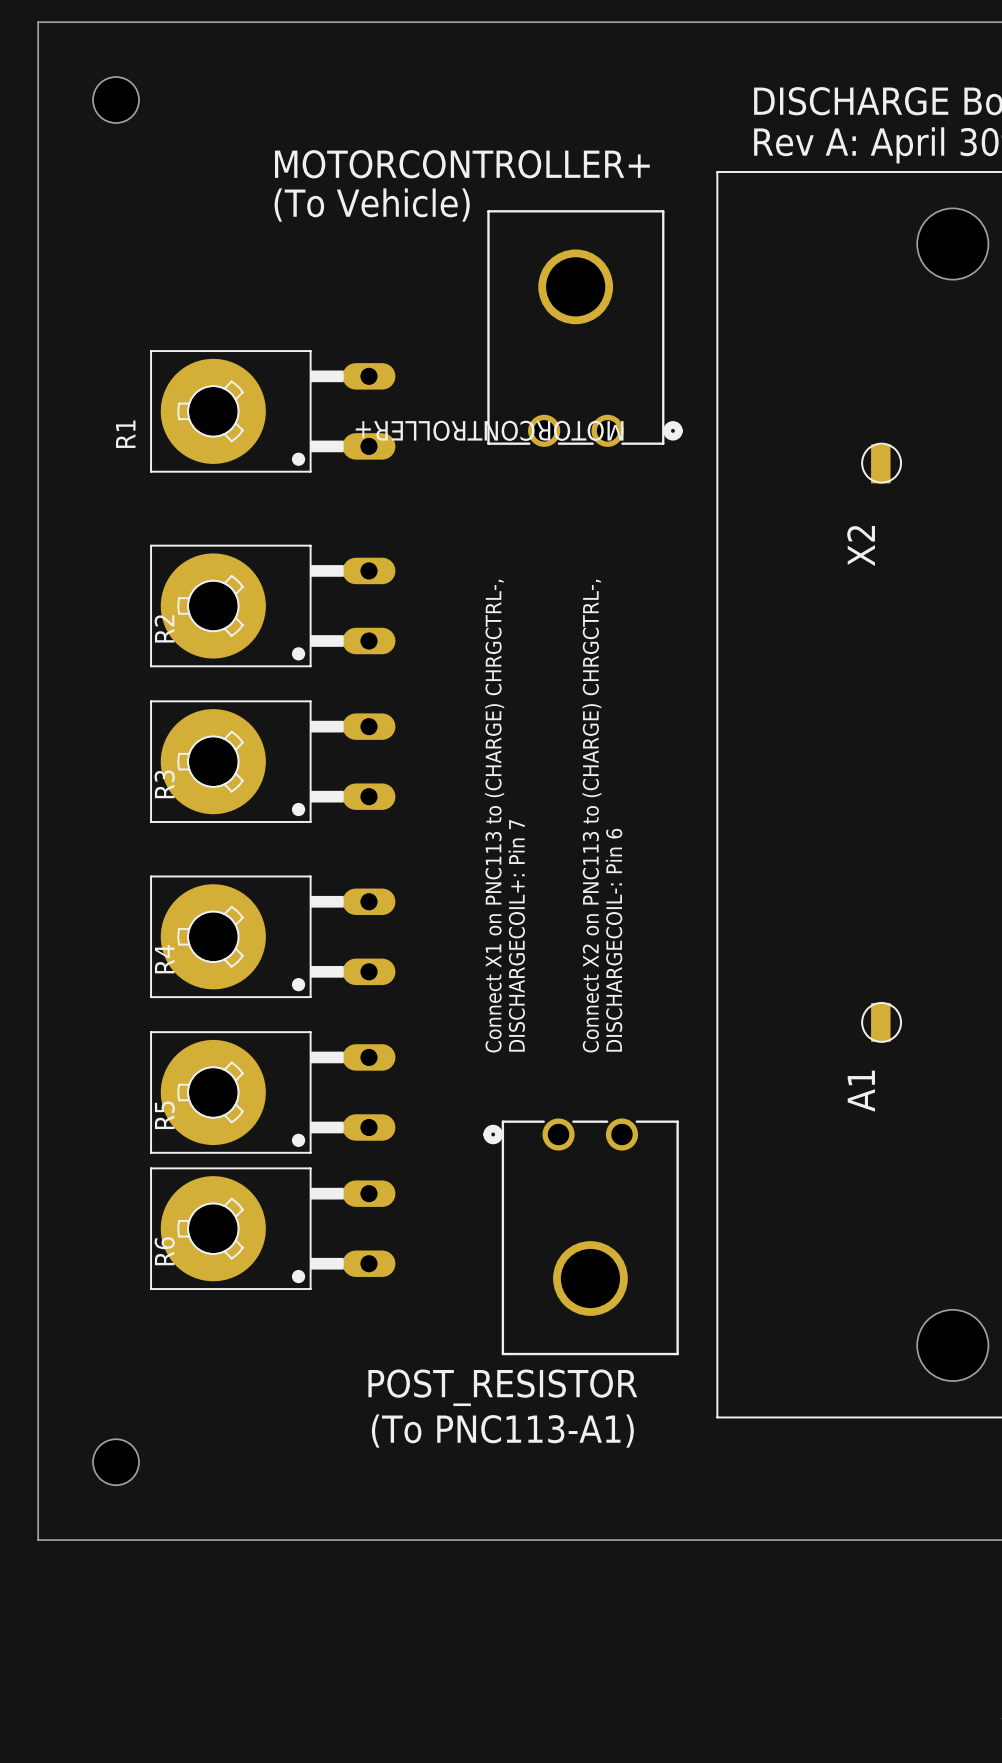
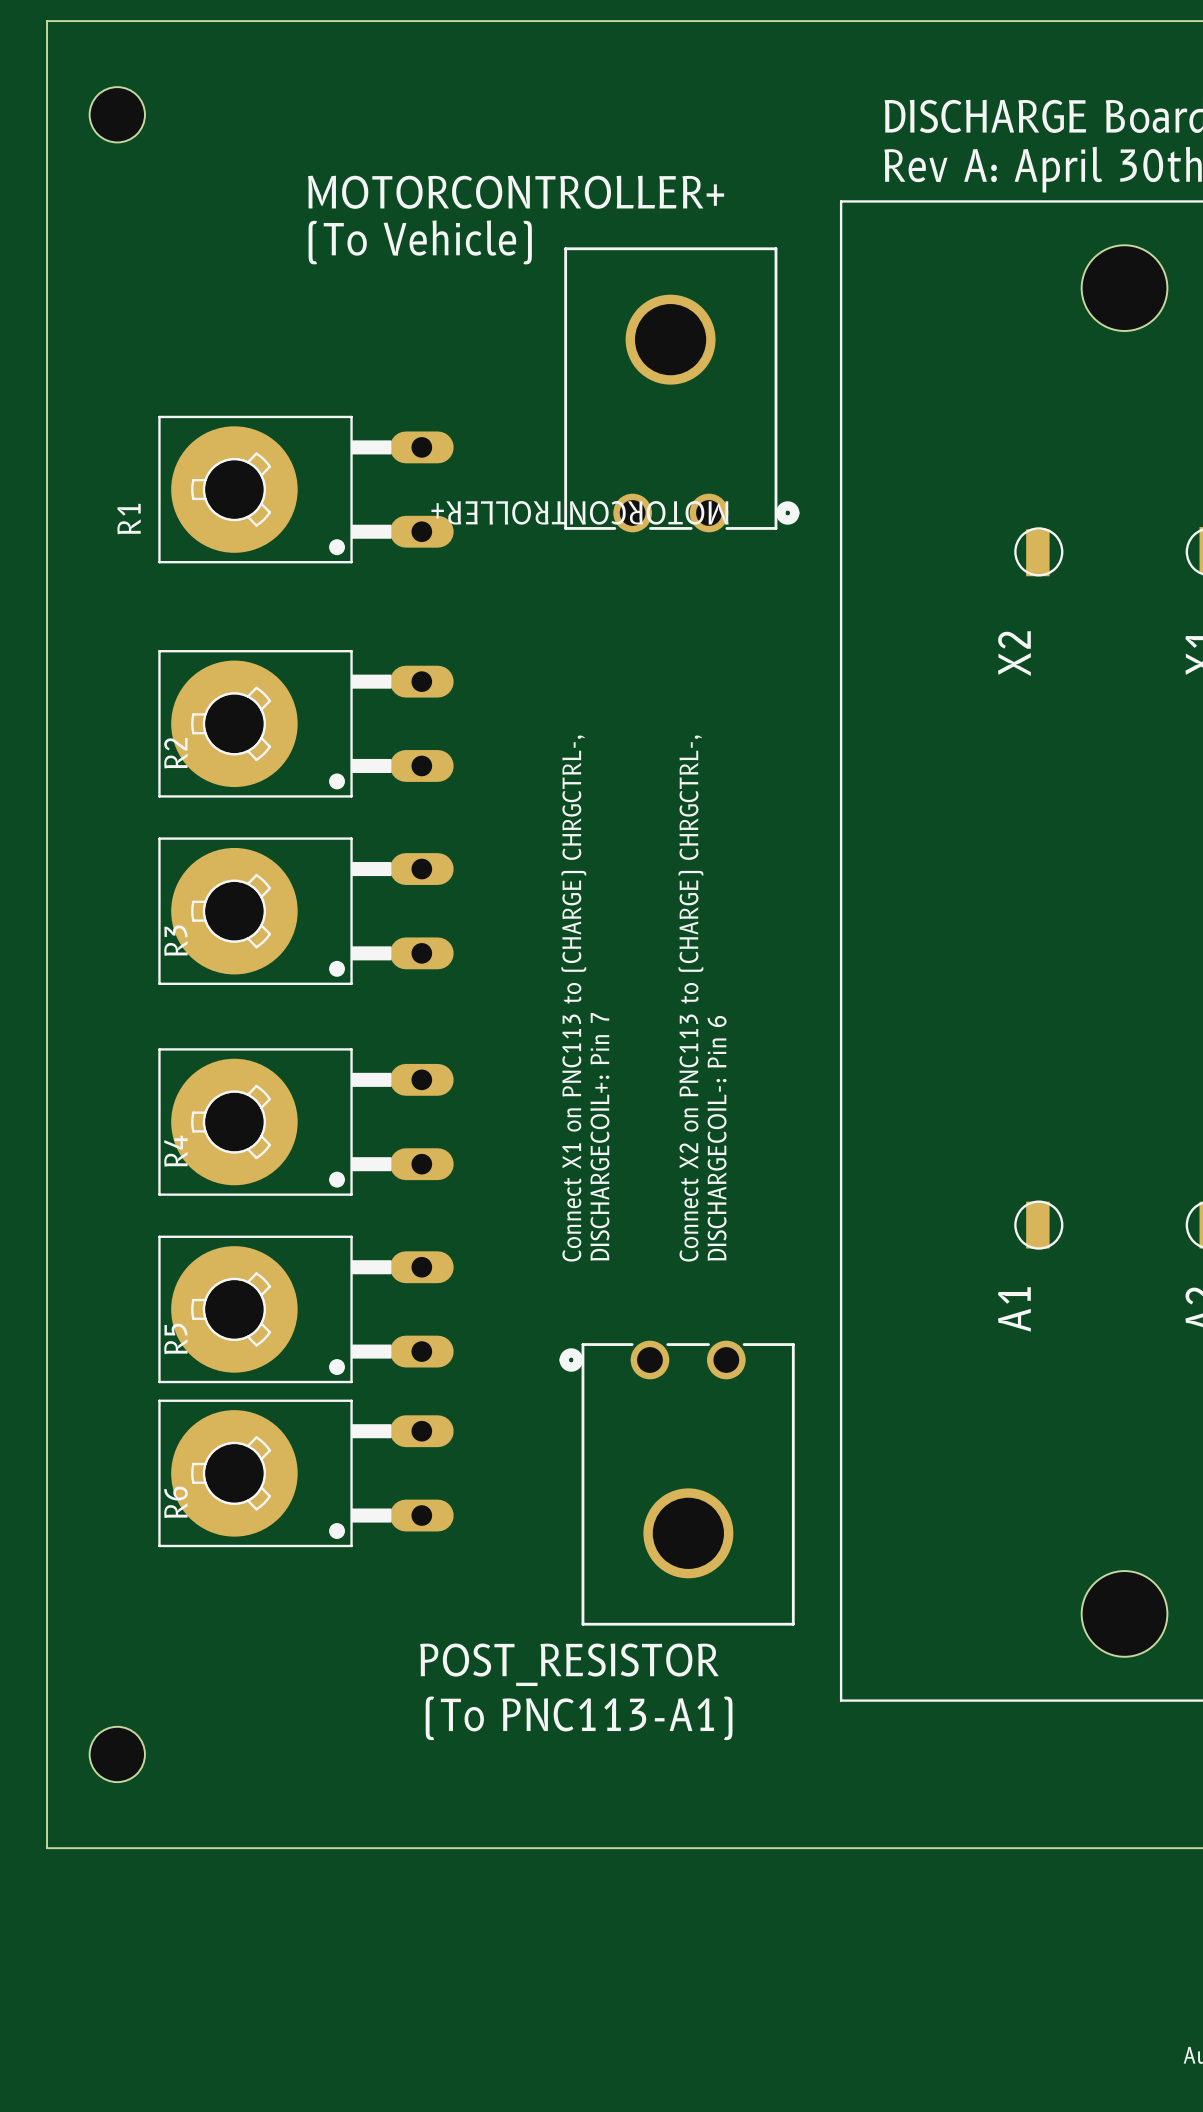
board edge: (57, 22) (38, 22) (38, 1540) (57, 1540) -> (47, 21) (47, 1848)

